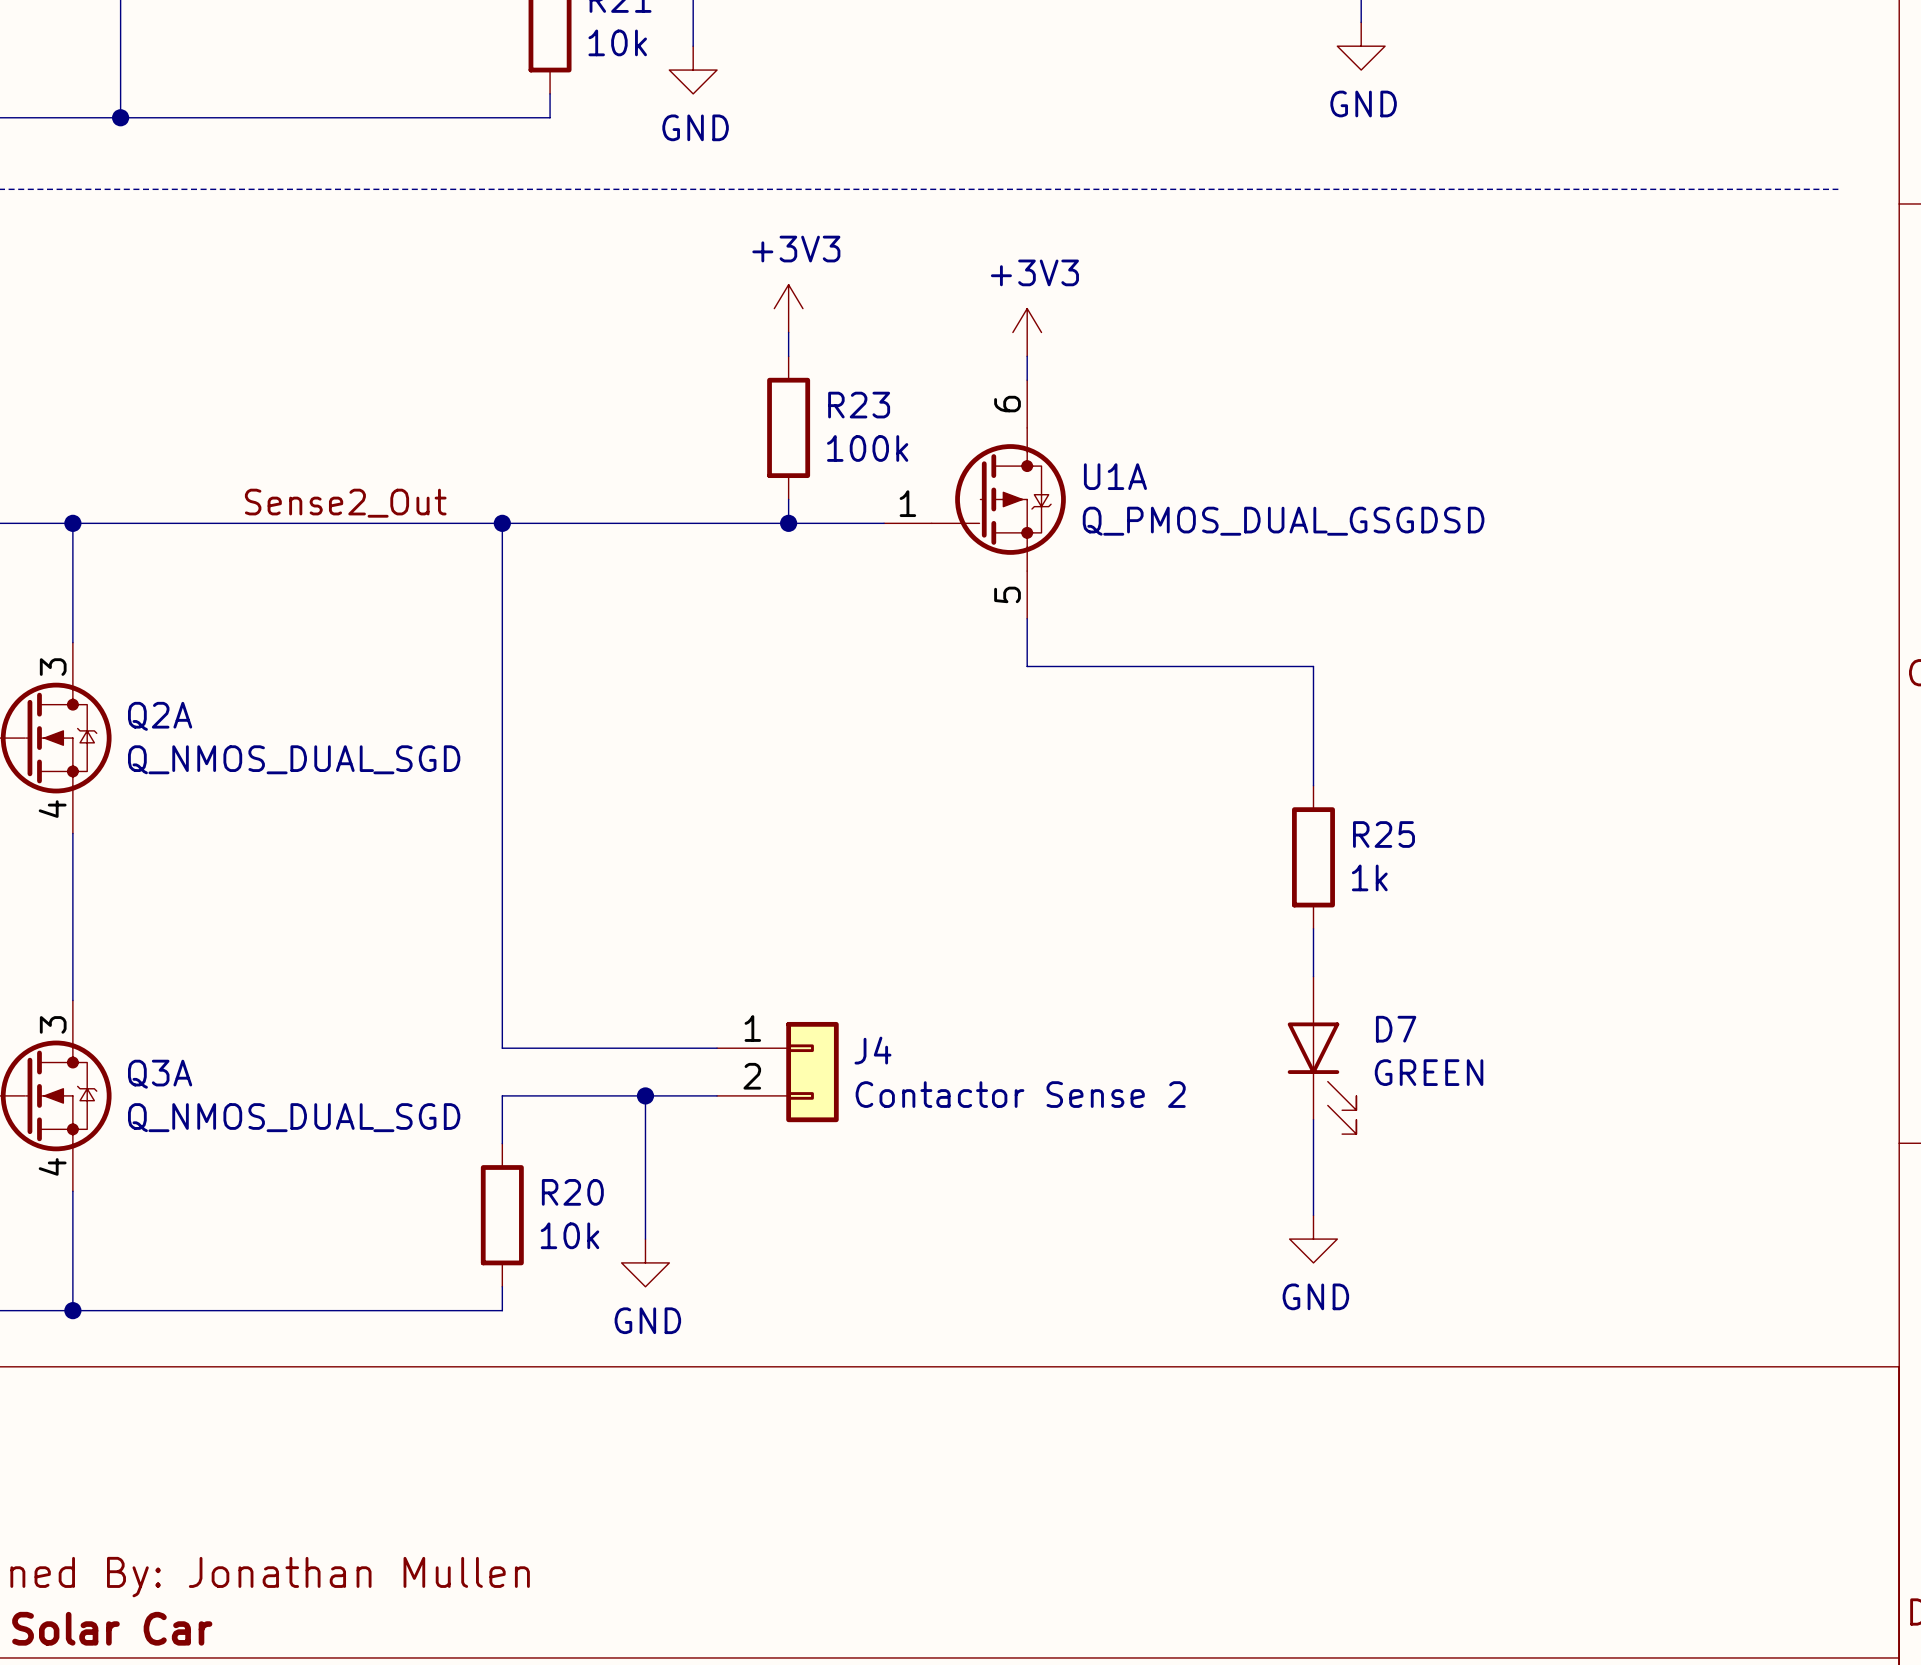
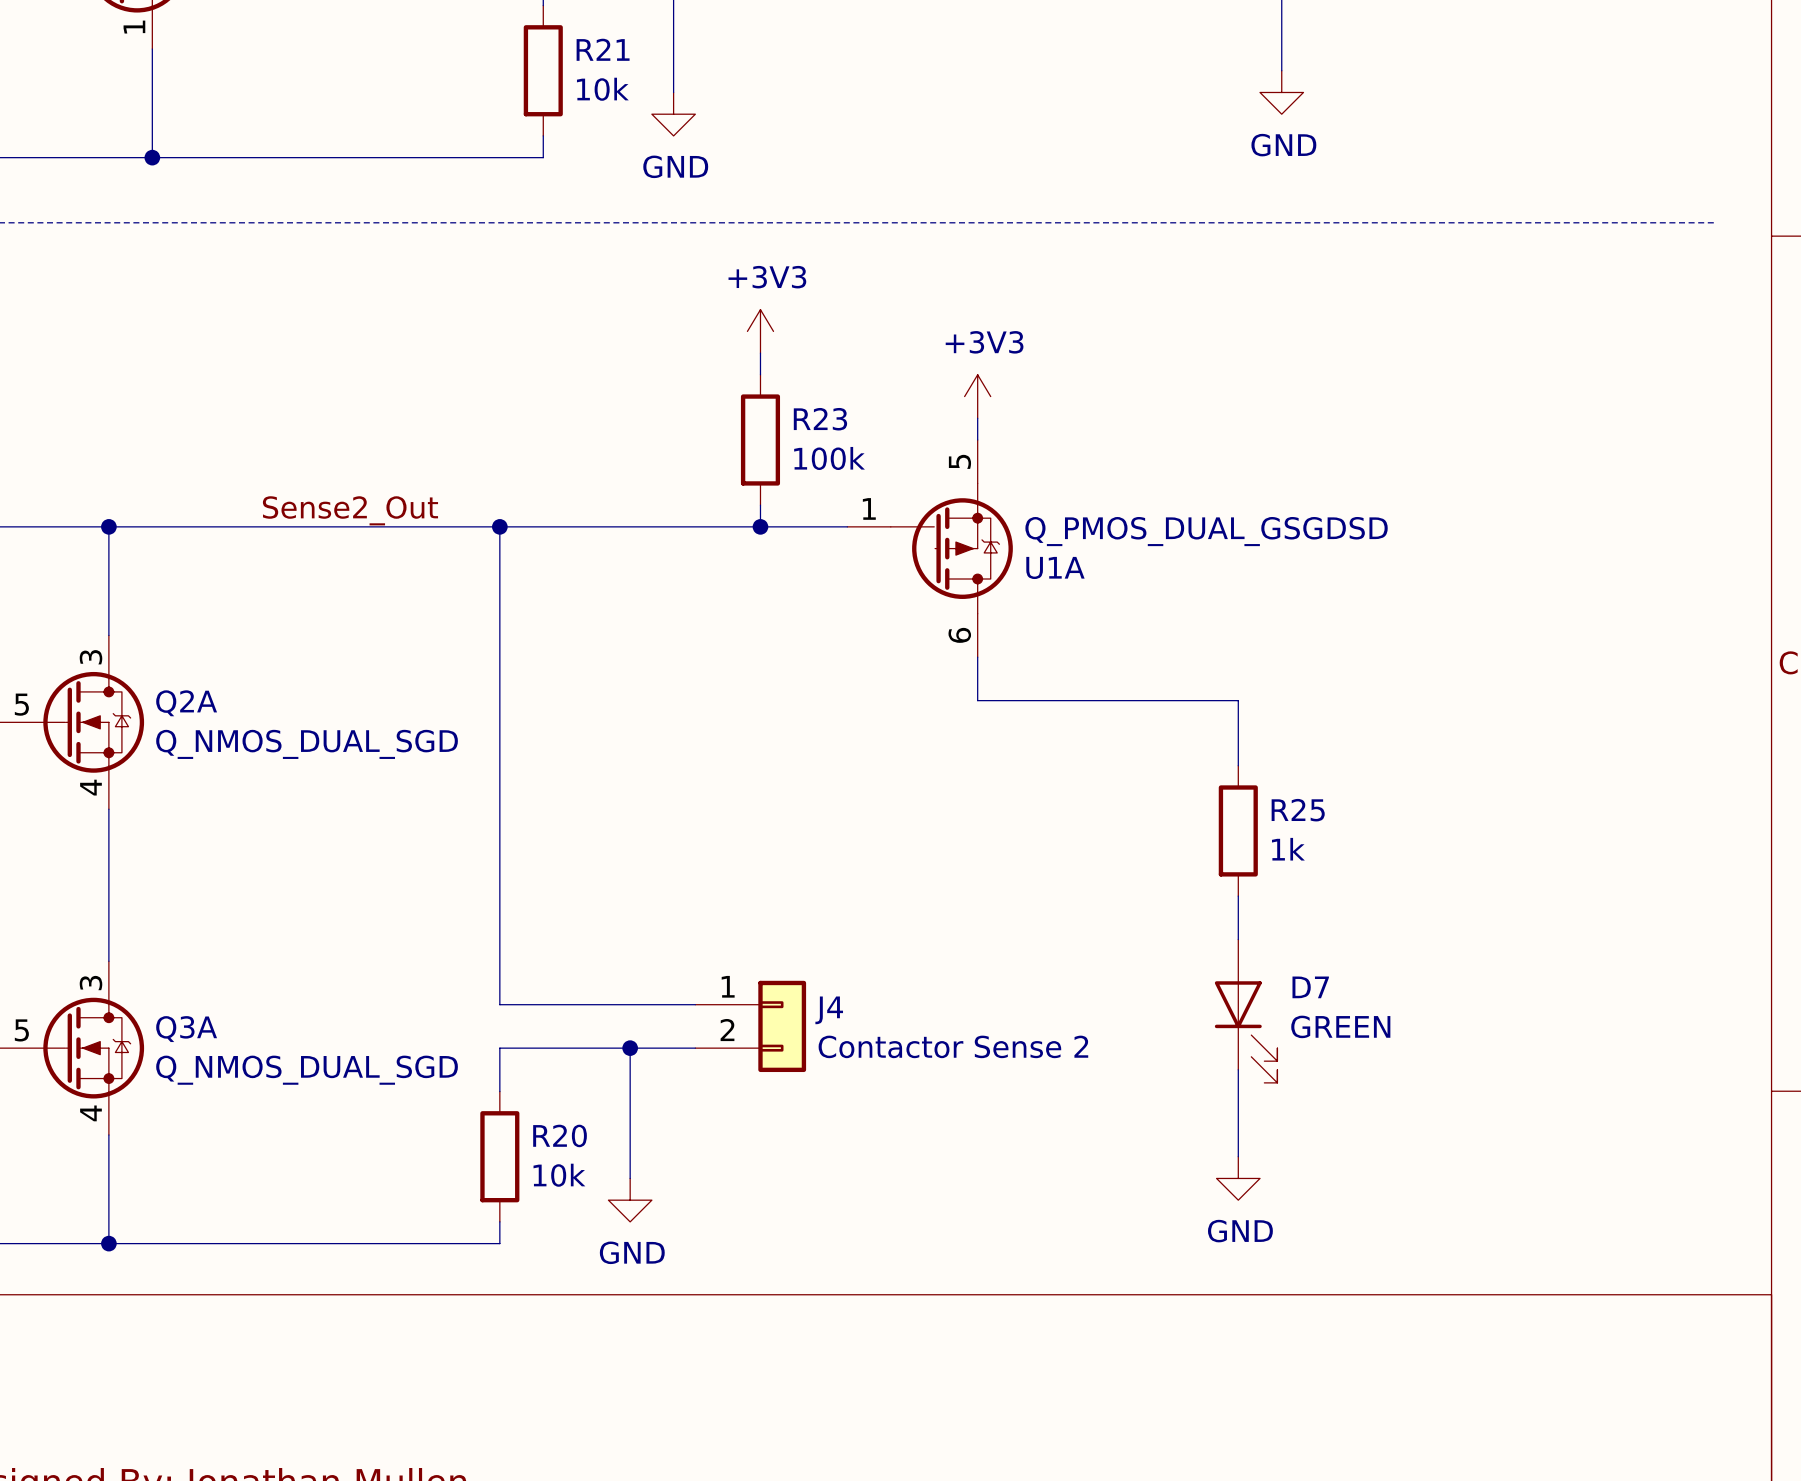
power symbol position: +3V3 (1027, 332) -> +3V3 (977, 396)
U1A flip: as is (998, 499) -> up-down (951, 548)
wire: (1027, 618) (1027, 666) (1313, 666) (1313, 714) -> (977, 657) (977, 700) (1238, 700)

